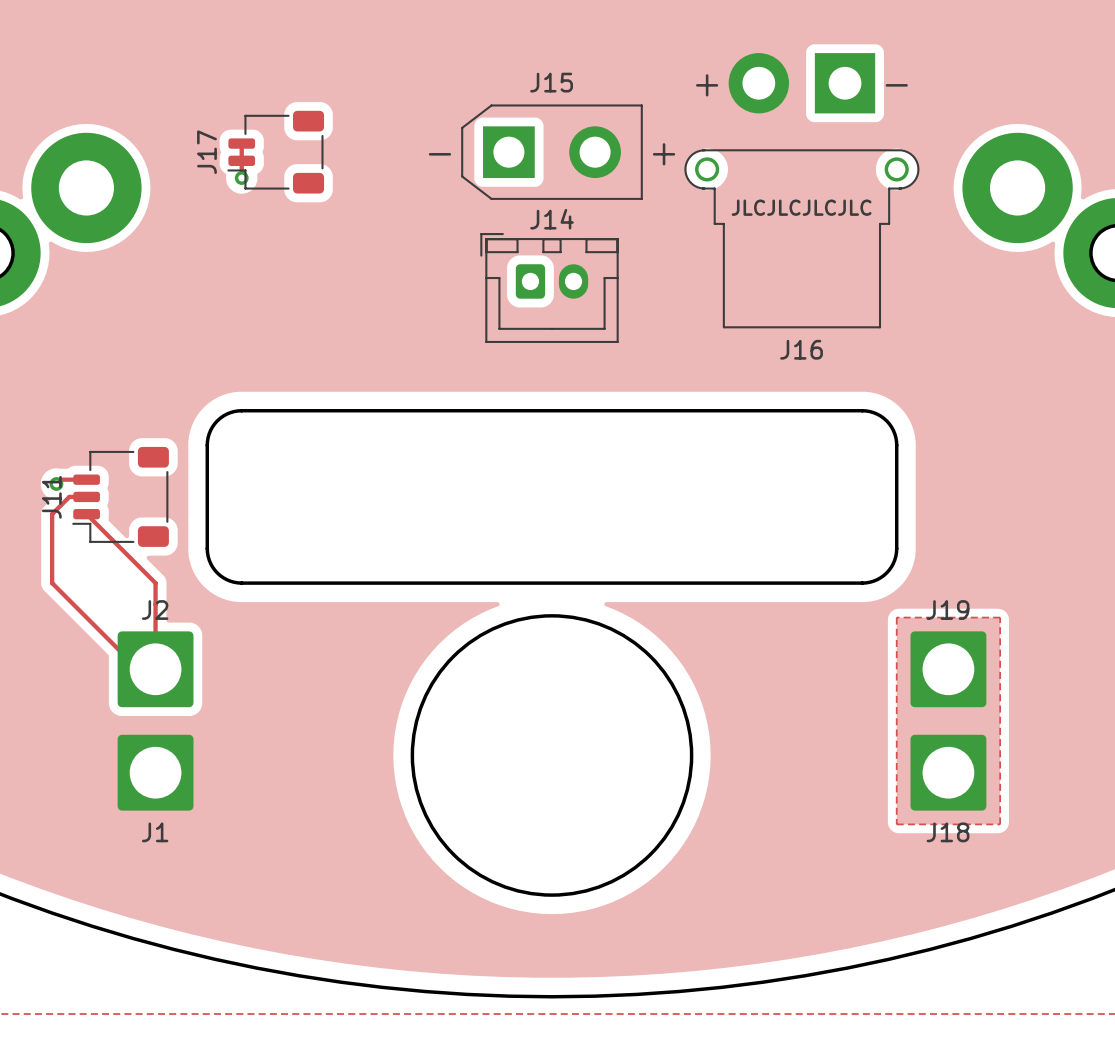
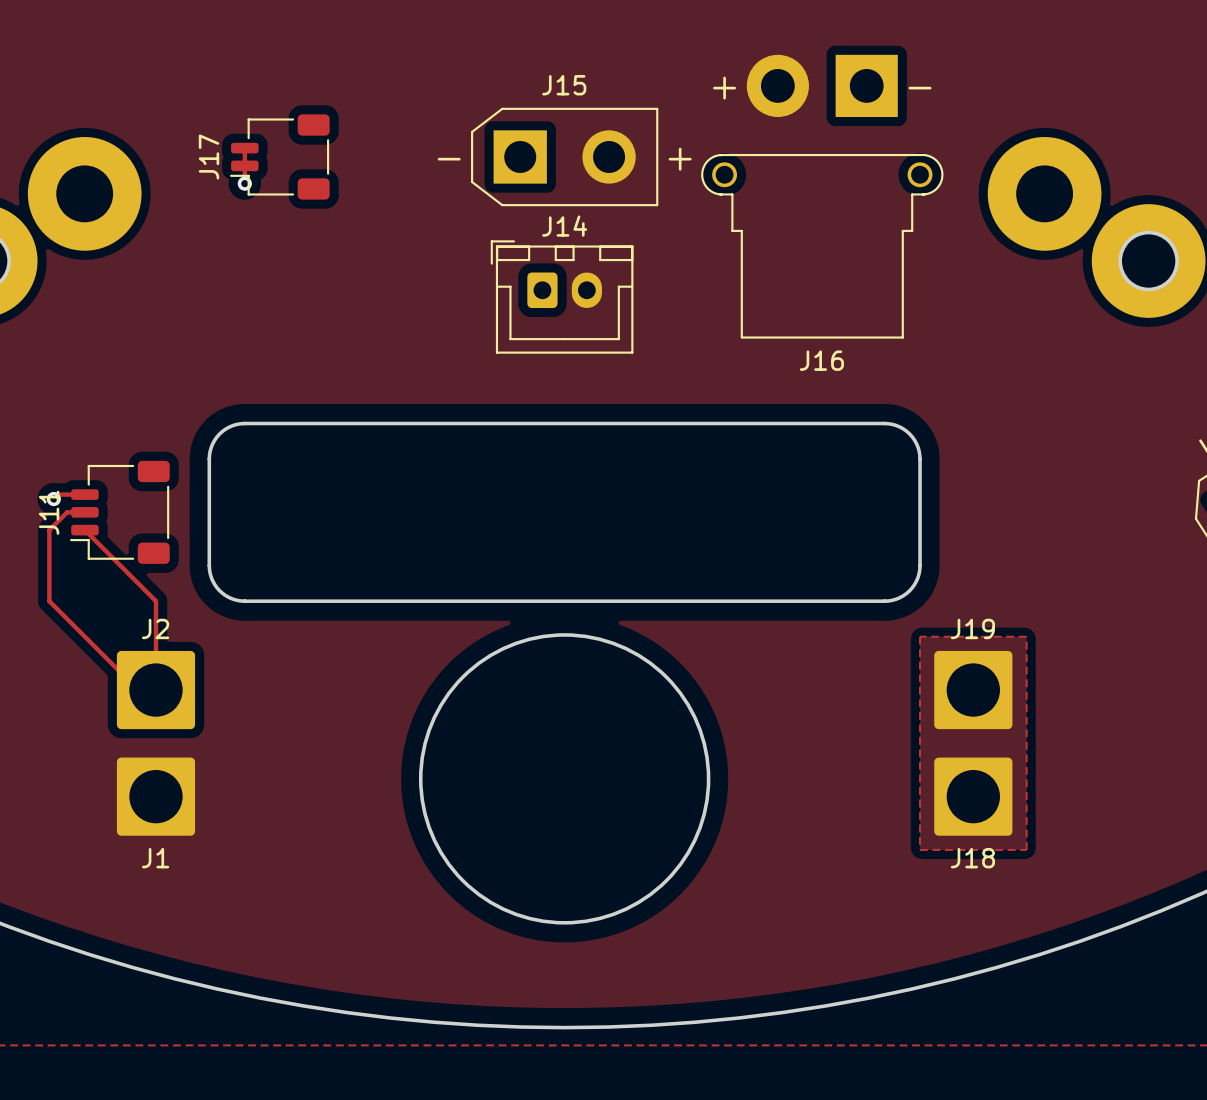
text: JLCJLCJLCJLC (801, 207) -> none

